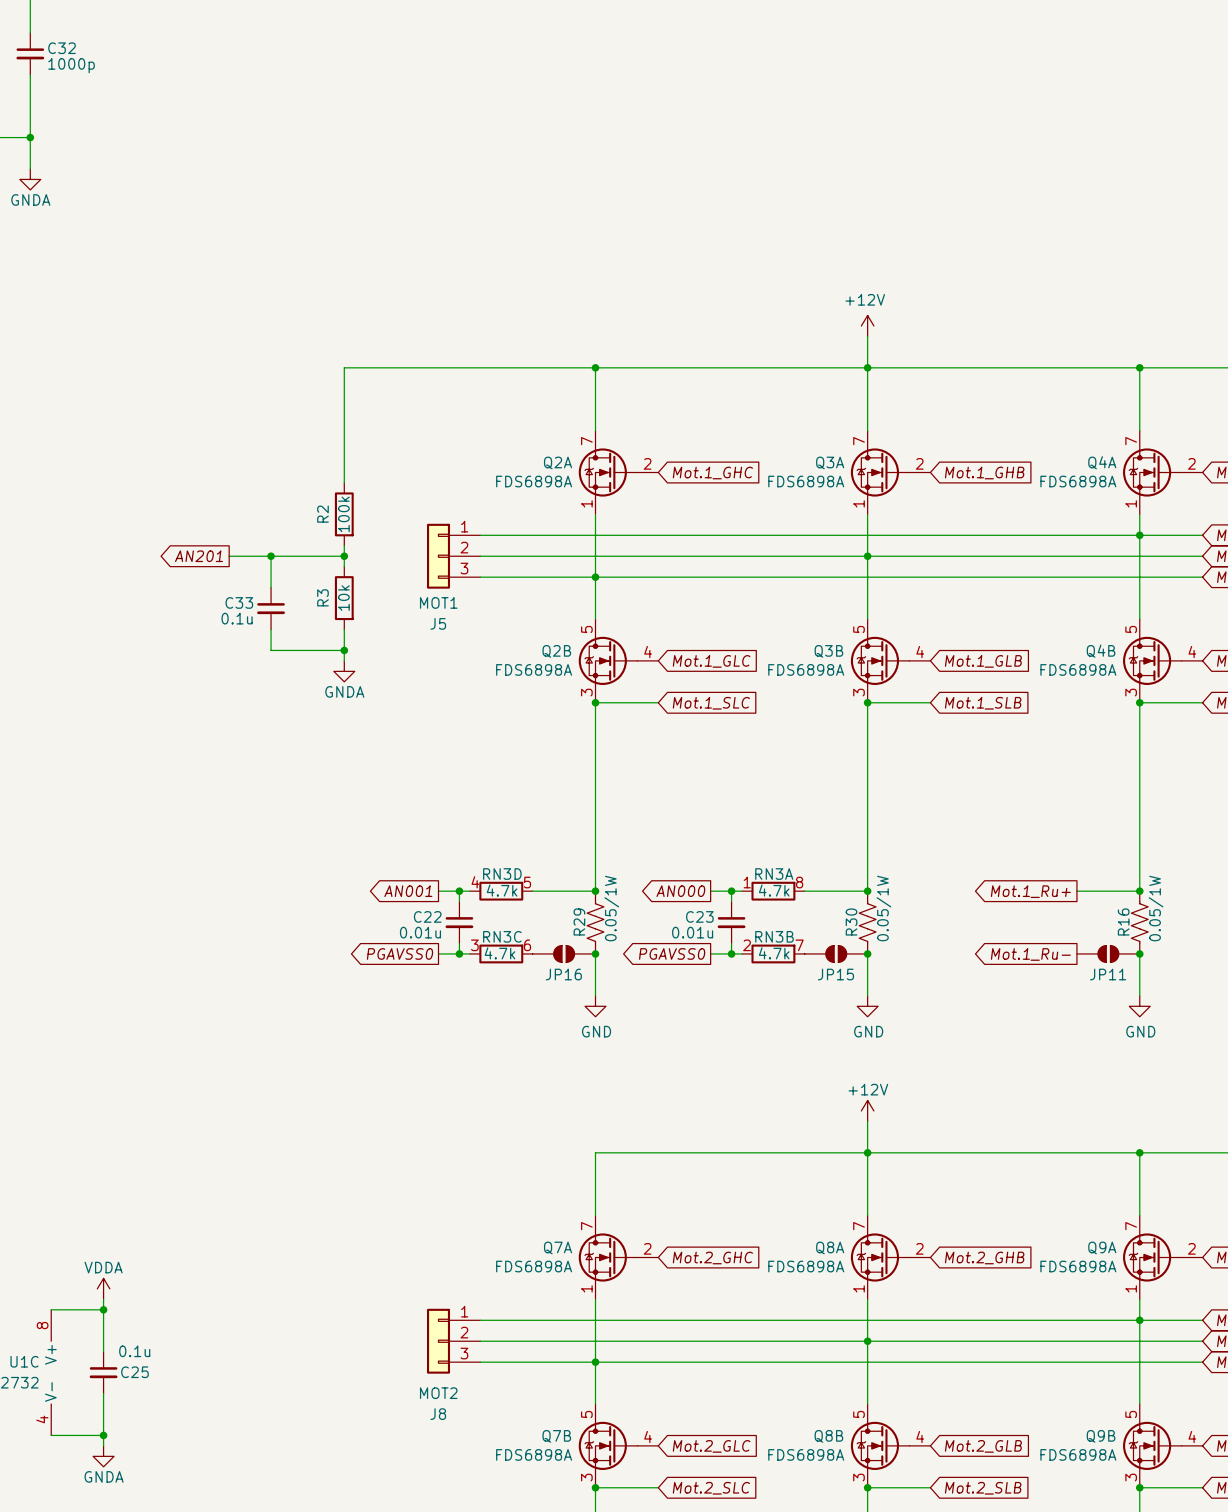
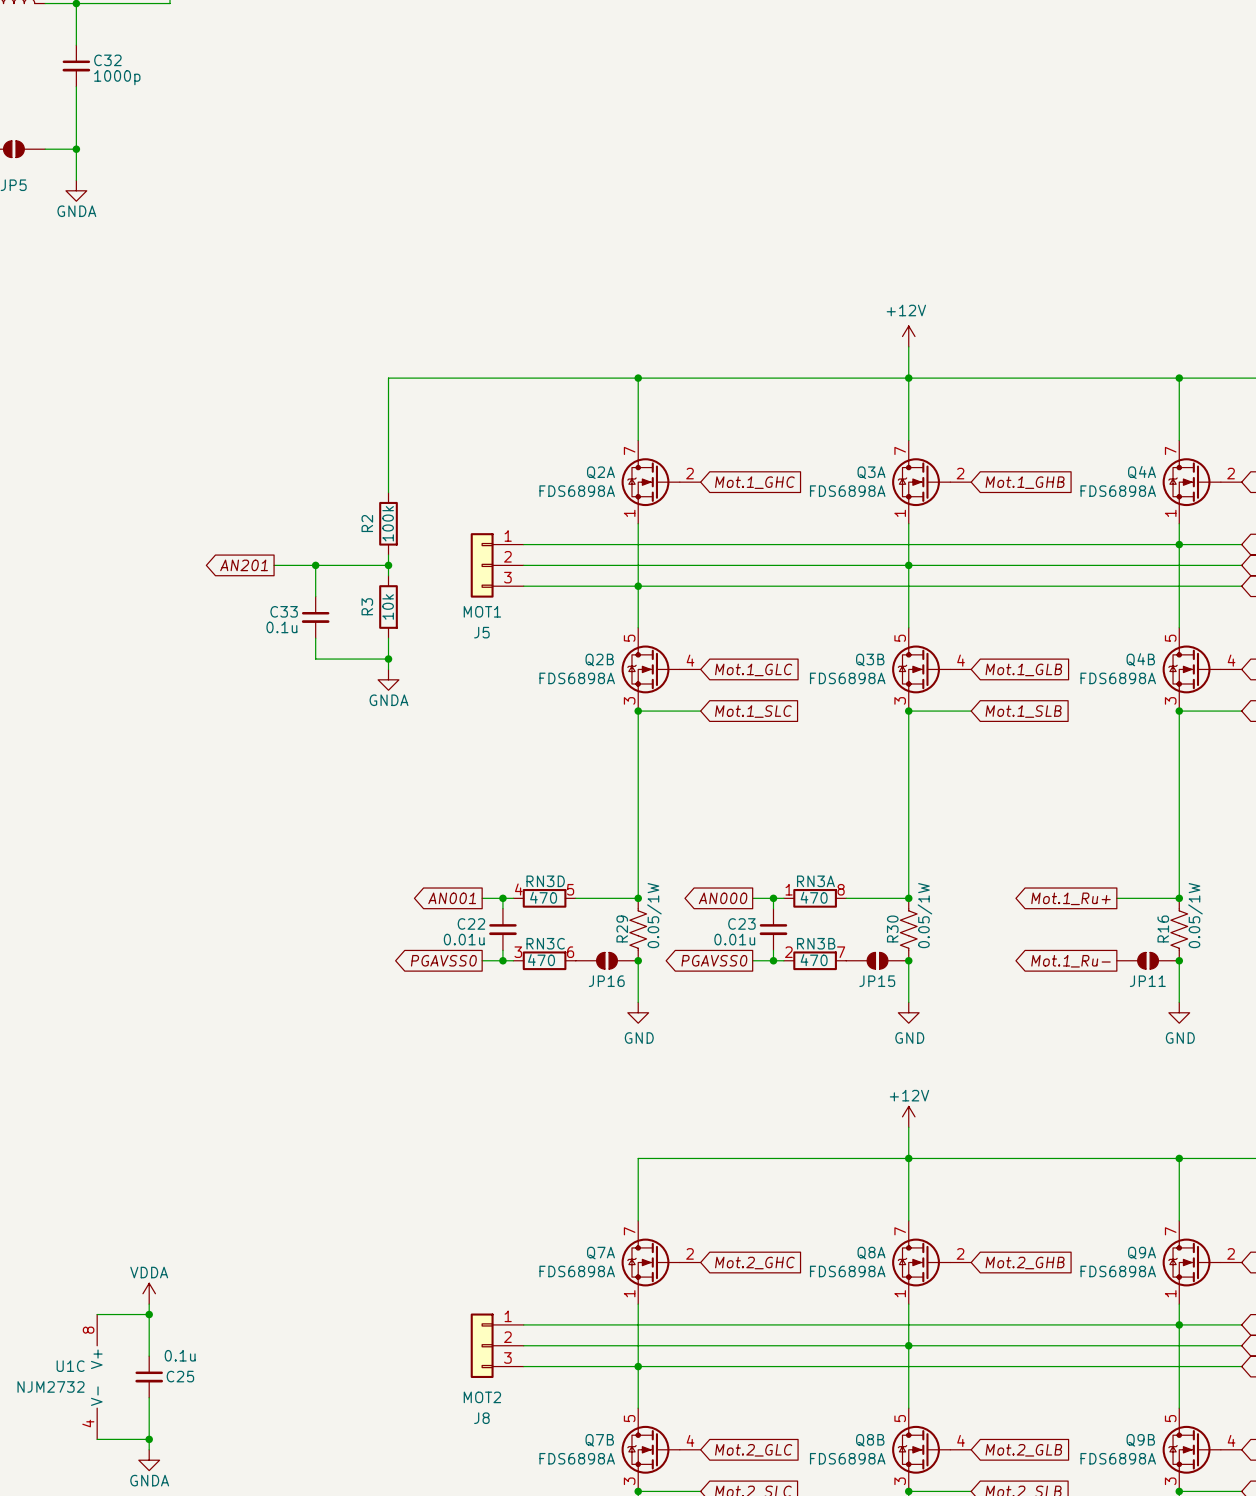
RN3D value: 4.7k (502, 890) -> 470 (543, 897)
RN3A value: 4.7k (774, 890) -> 470 (814, 897)
RN3C value: 4.7k (499, 953) -> 470 (541, 960)
RN3B value: 4.7k (774, 953) -> 470 (814, 960)

